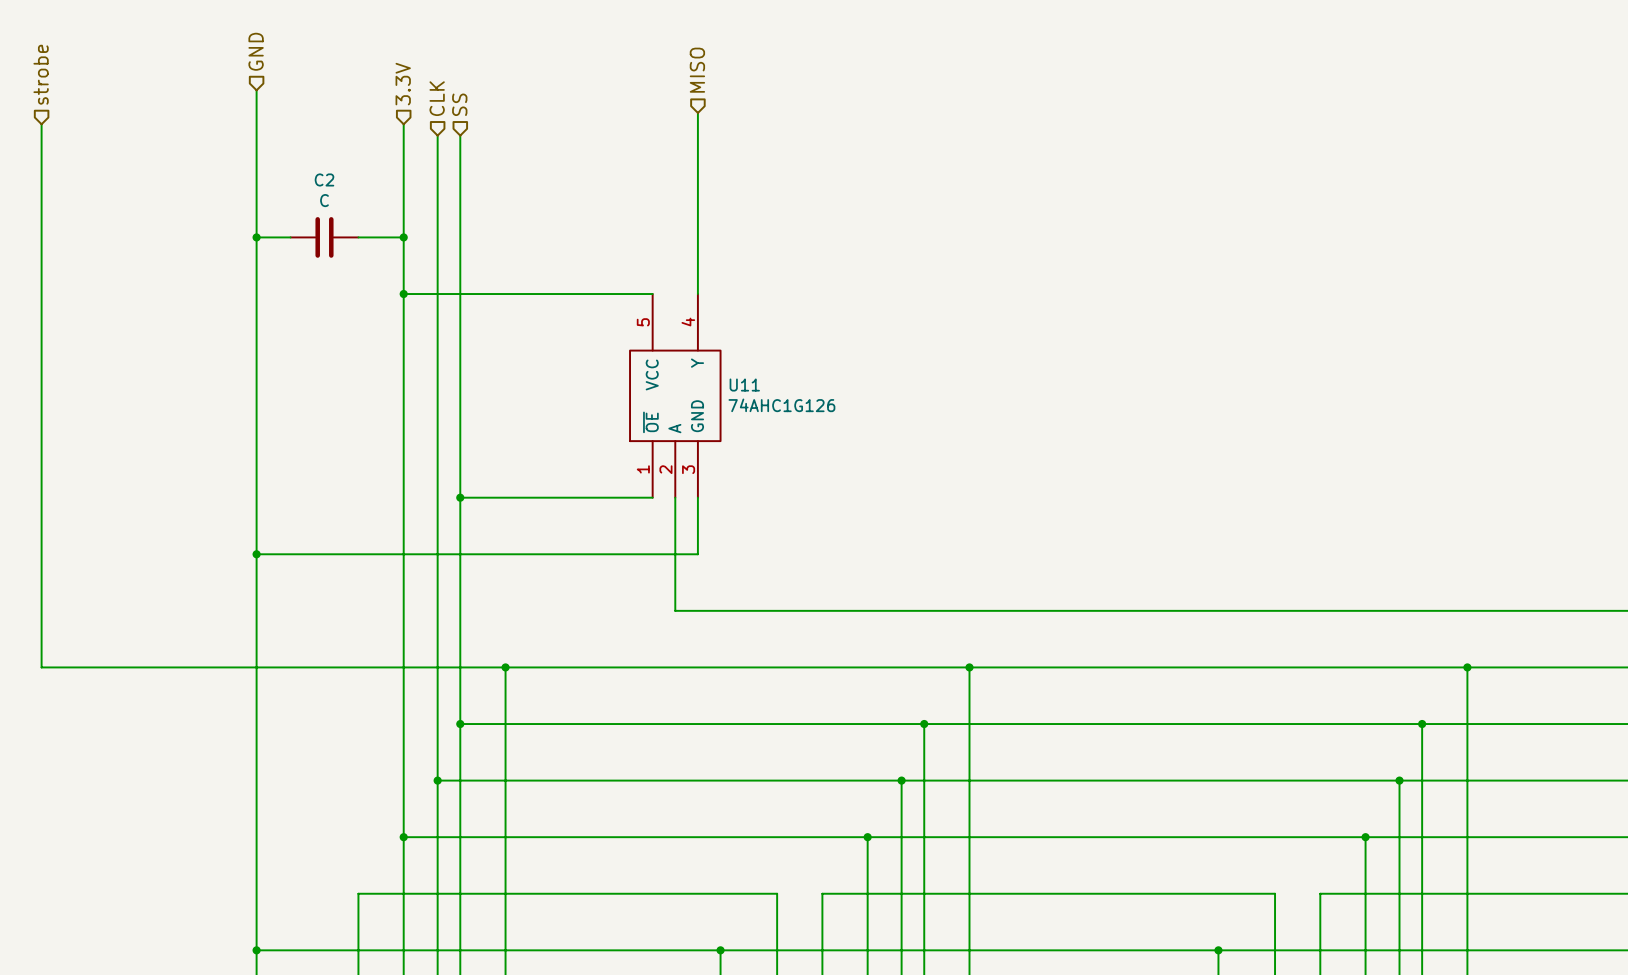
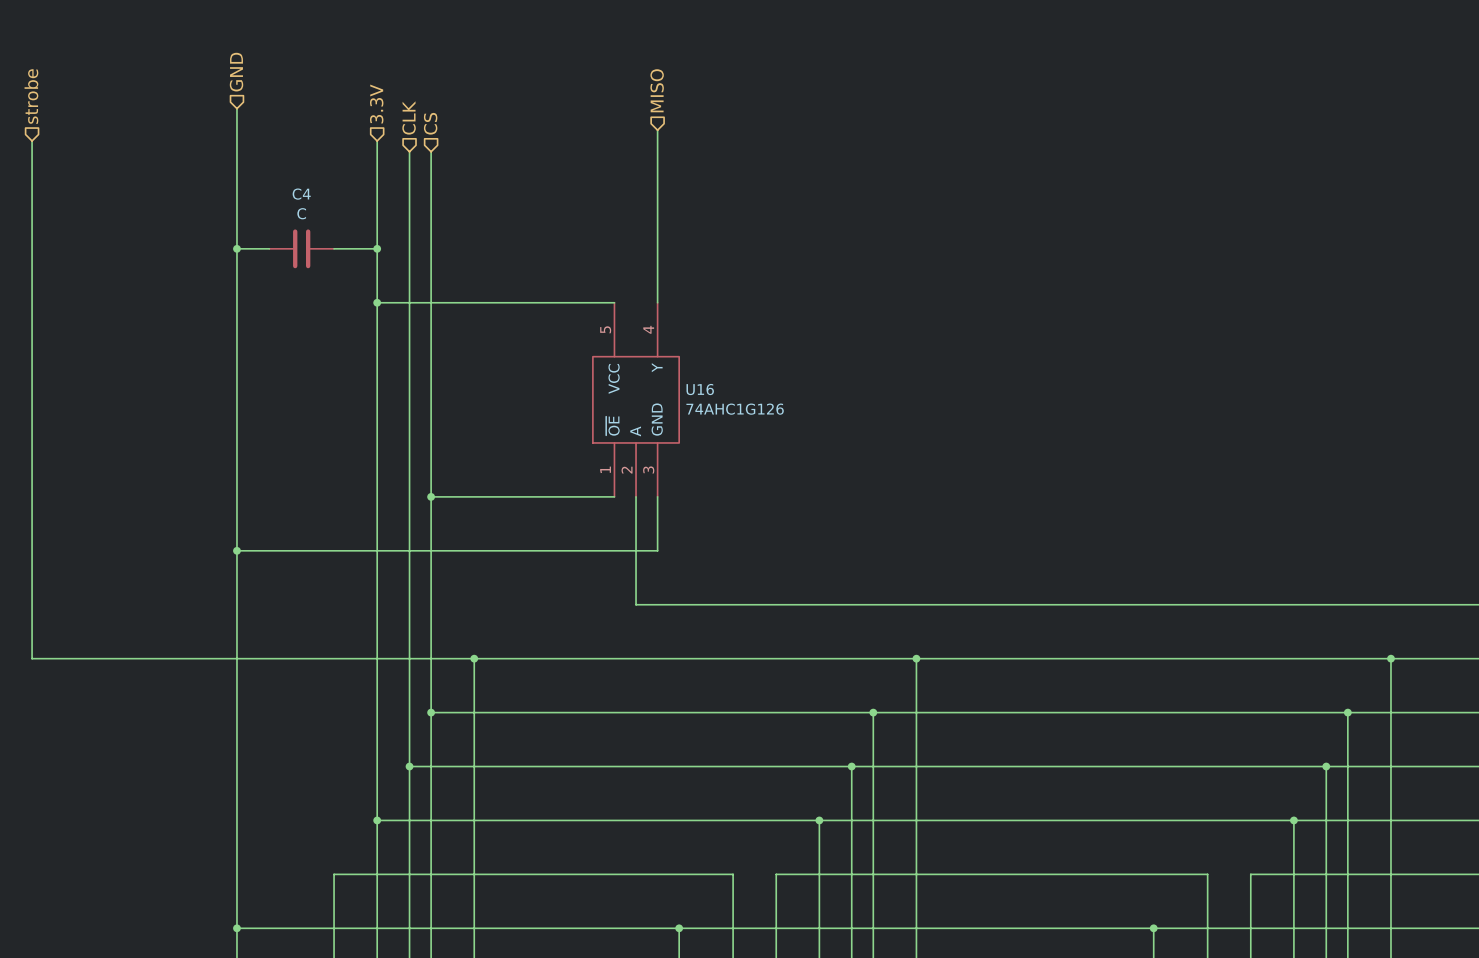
hierarchical label: SS (459, 104) -> CS (430, 123)
C2 name: C2 (324, 179) -> C4 (301, 194)
U11 name: U11 (744, 385) -> U16 (700, 389)

